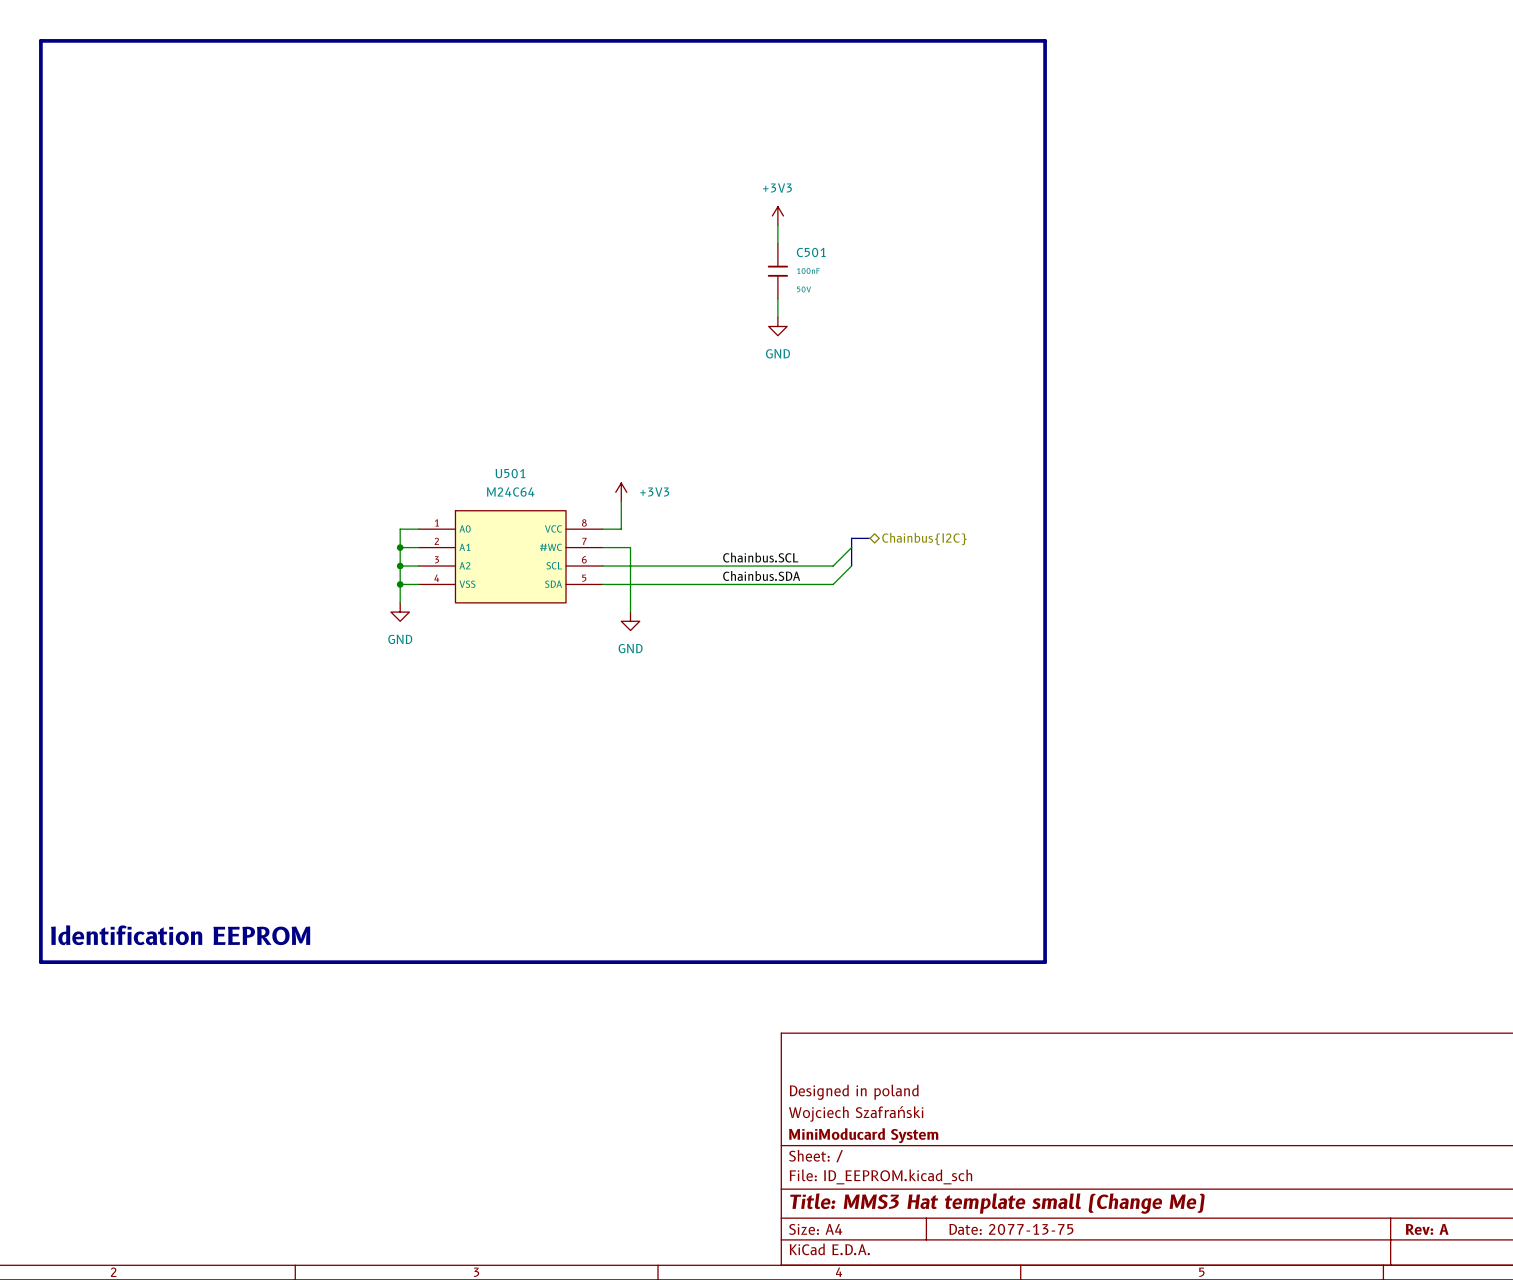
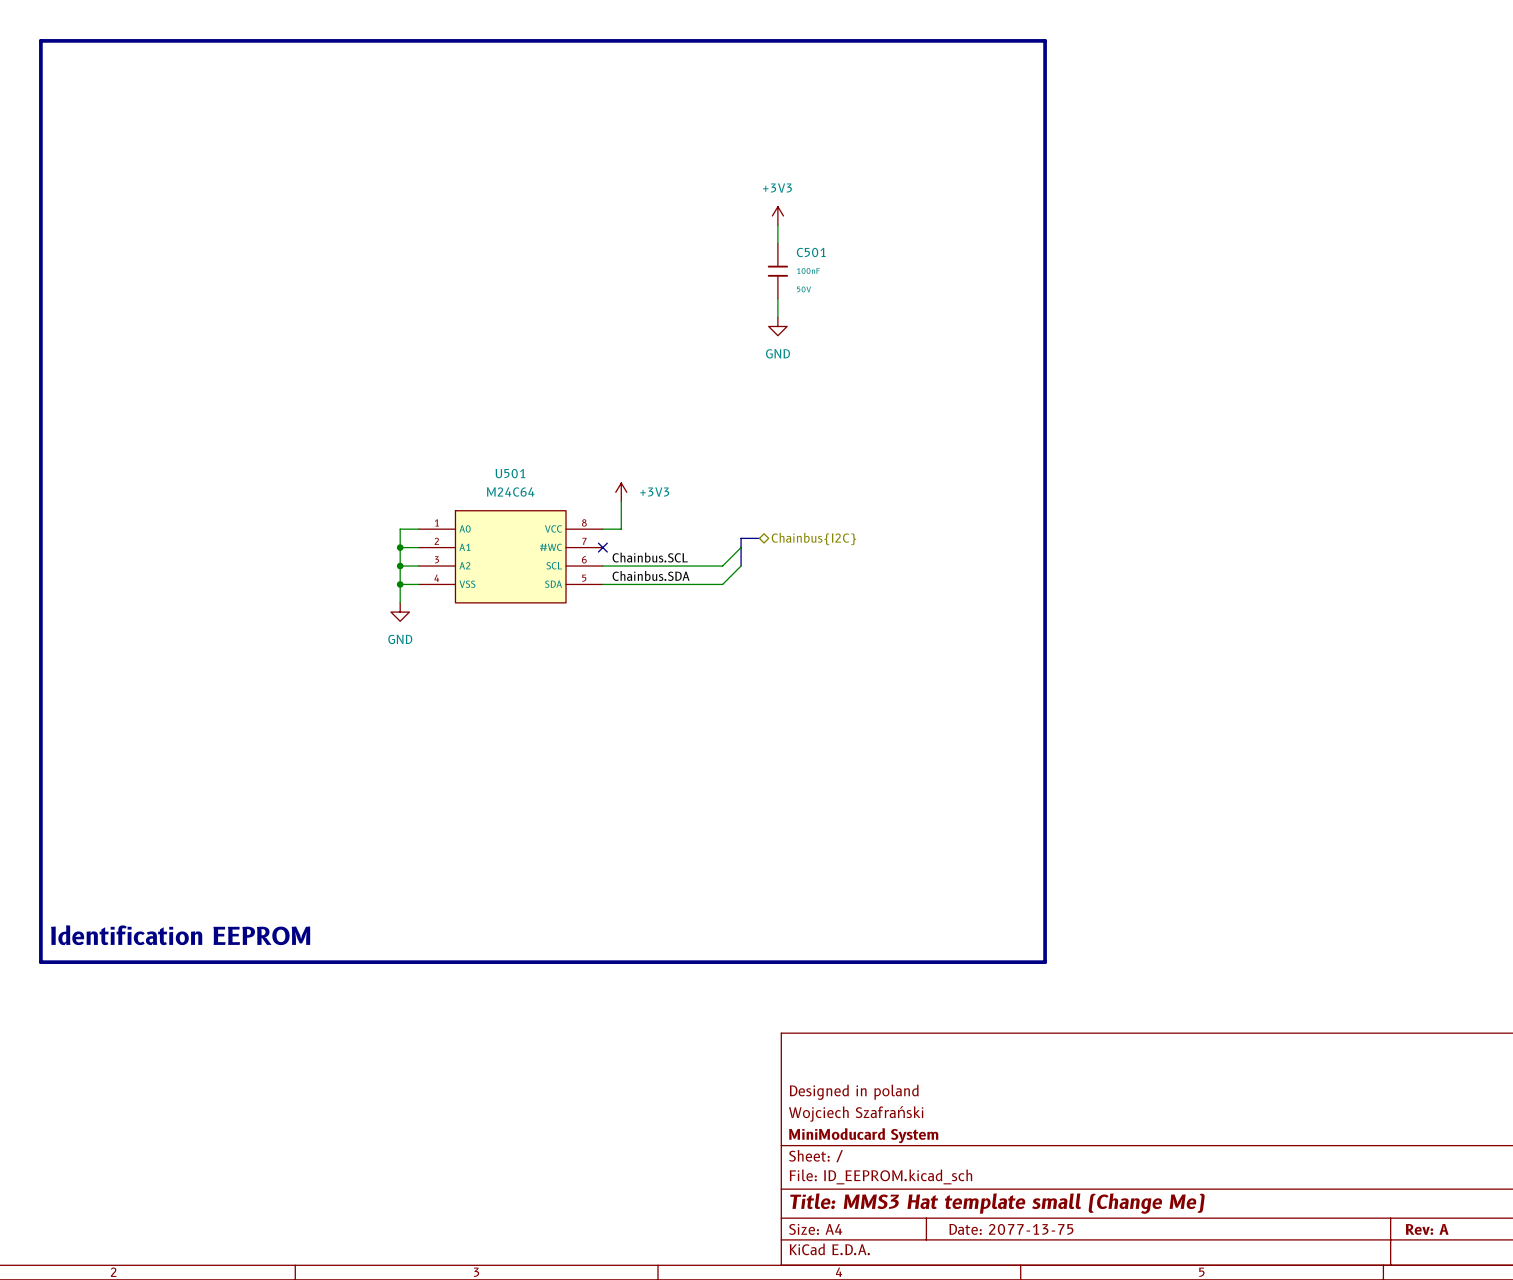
bus: (870, 538) (851, 538) (851, 566) -> (759, 538) (741, 538) (741, 566)
hierarchical label position: Chainbus{I2C} (924, 539) -> Chainbus{I2C} (813, 539)
wire: (602, 547) (630, 547) (630, 612) -> none
no-connect mark: none -> (602, 547)
wire: (851, 547) (833, 566) (722, 566) -> (741, 547) (722, 566)
label position: Chainbus.SCL (760, 557) -> Chainbus.SCL (650, 557)
wire: (851, 566) (833, 584) (722, 584) -> (741, 566) (722, 584)
label position: Chainbus.SDA (761, 575) -> Chainbus.SDA (651, 575)
power symbol: GND (630, 621) -> none

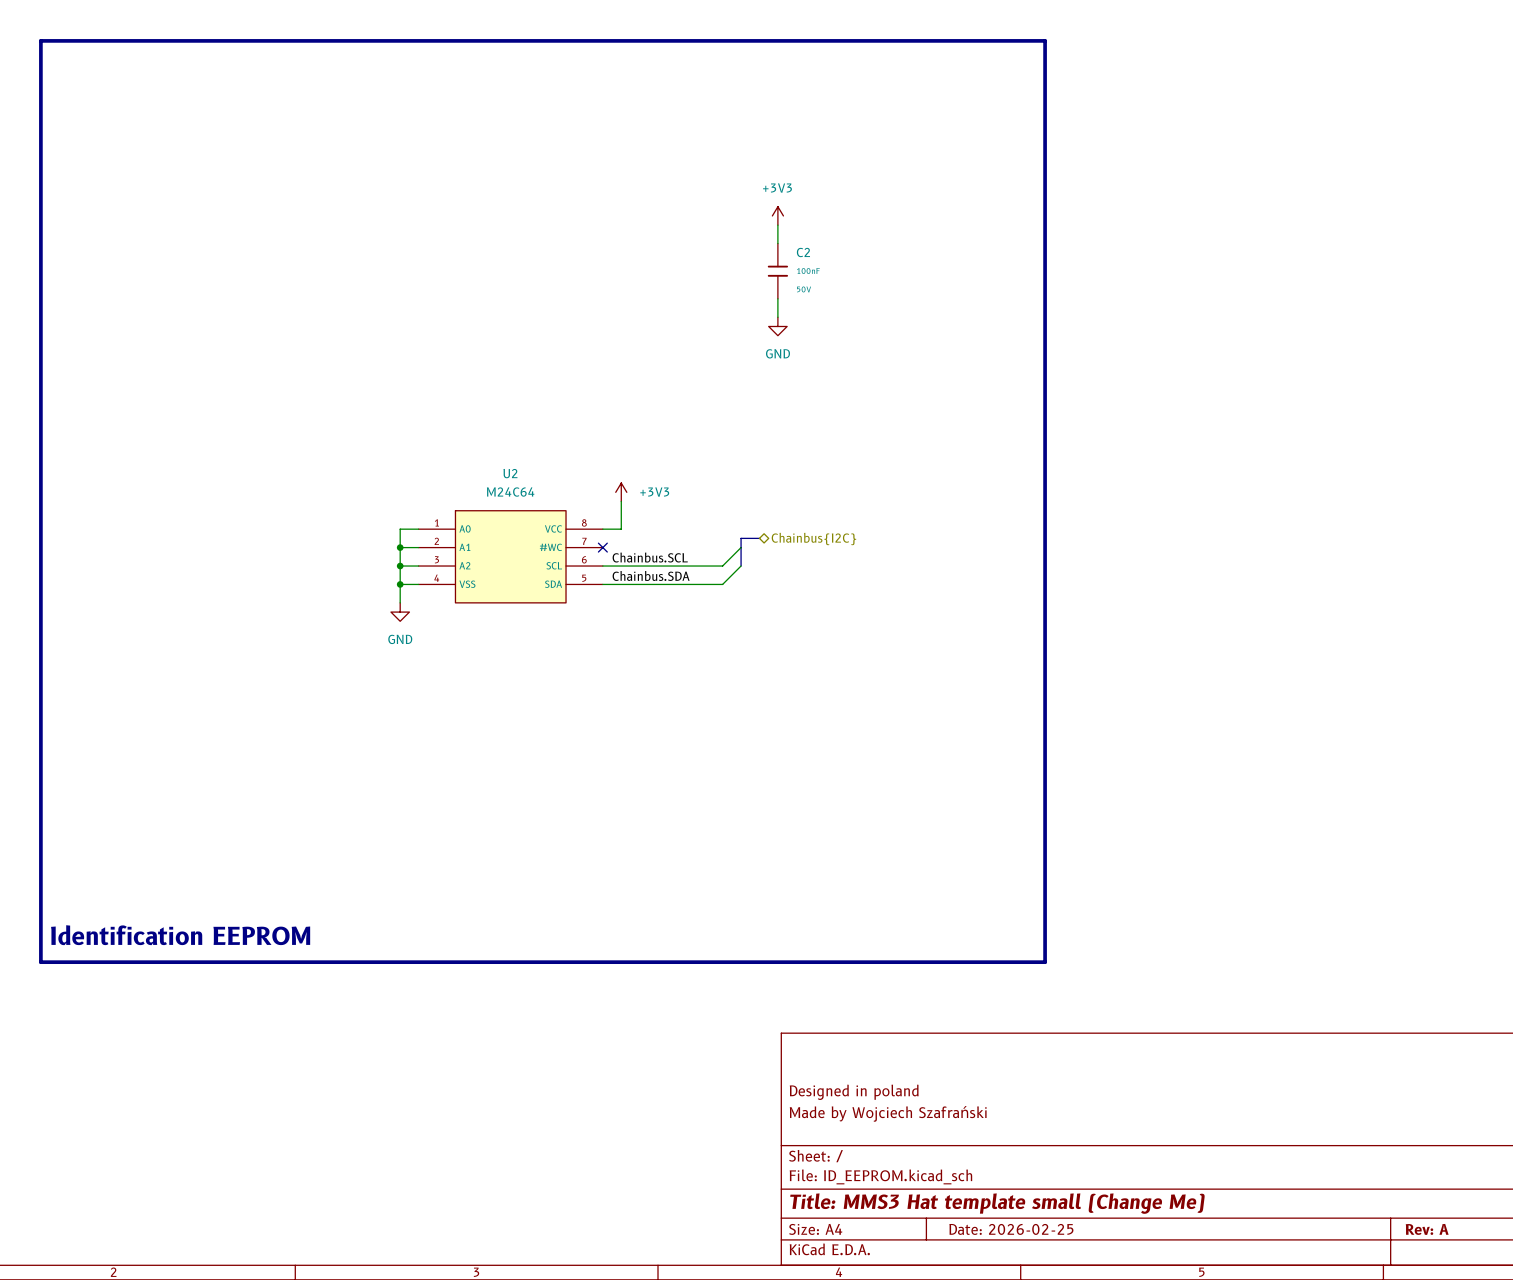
C501 name: C501 (811, 252) -> C2 (803, 252)
U501 name: U501 (510, 473) -> U2 (510, 473)
title block: Wojciech Szafrański (856, 1113) -> Made by Wojciech Szafrański (888, 1113)
title block: MiniModucard System (863, 1135) -> none
title block: Date: 2077-13-75 (1011, 1229) -> Date: 2026-02-25 (1011, 1229)

